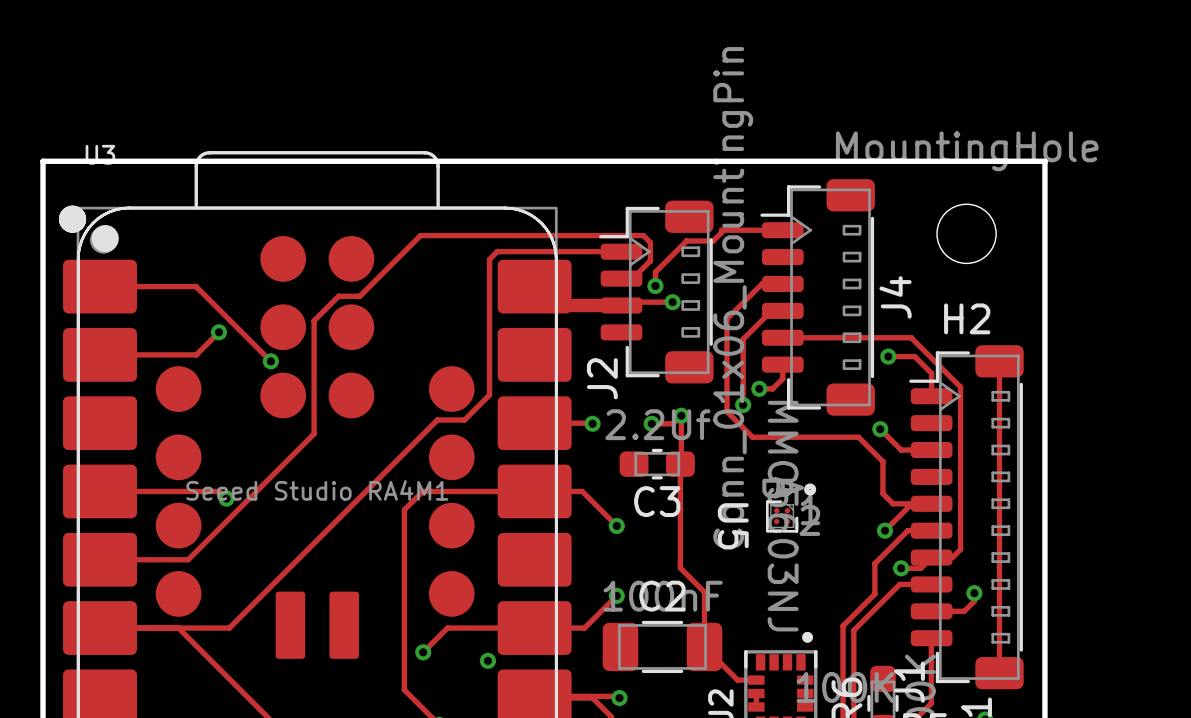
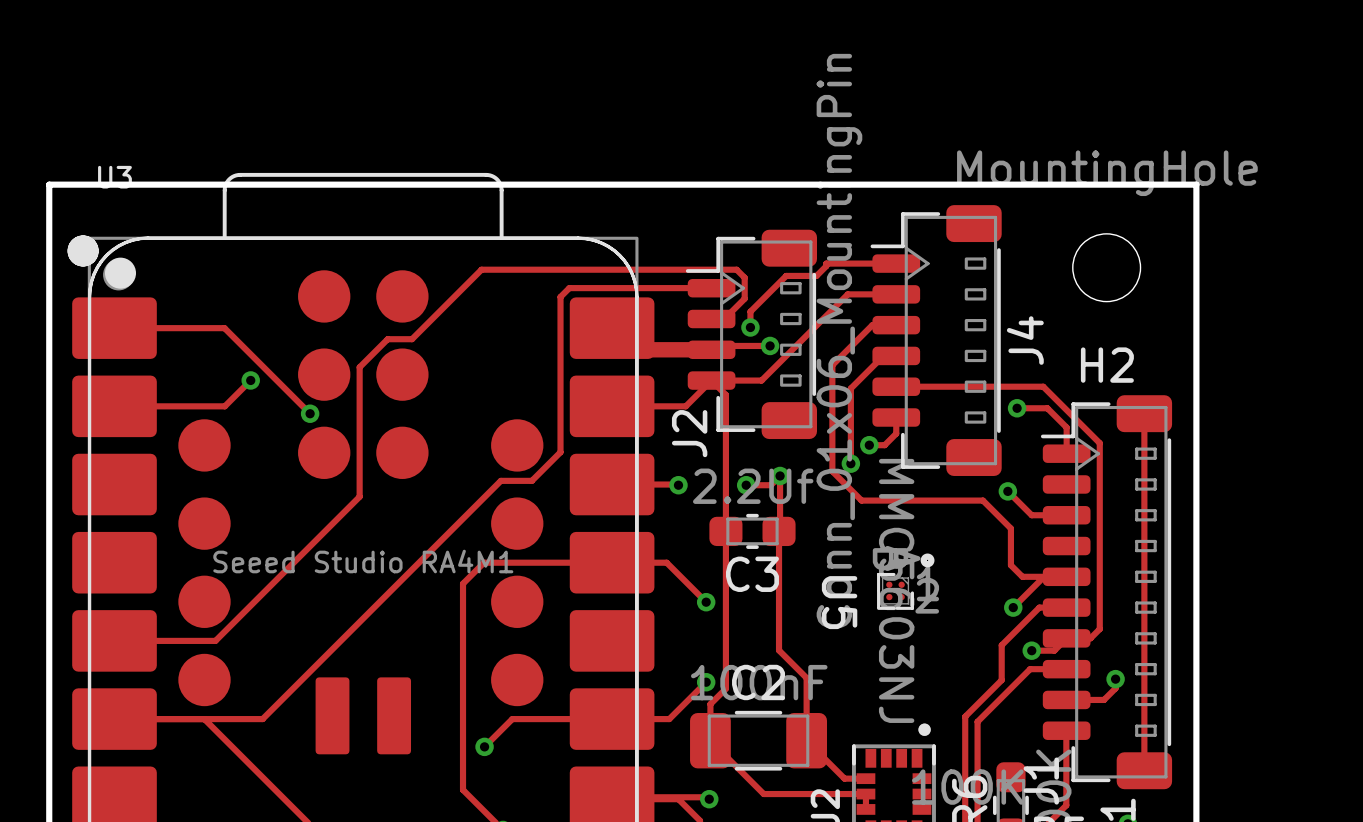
track: none -> (896, 294) (847, 294) (761, 380) (711, 380)
track: none -> (711, 380) (685, 406) (612, 406)
track: none -> (711, 380) (725, 394) (725, 688) (710, 704) (710, 740) (763, 794) (865, 794)
track: (100, 491) (219, 491) (226, 498) -> none
via: (226, 498) -> none
via: (487, 660) -> none

